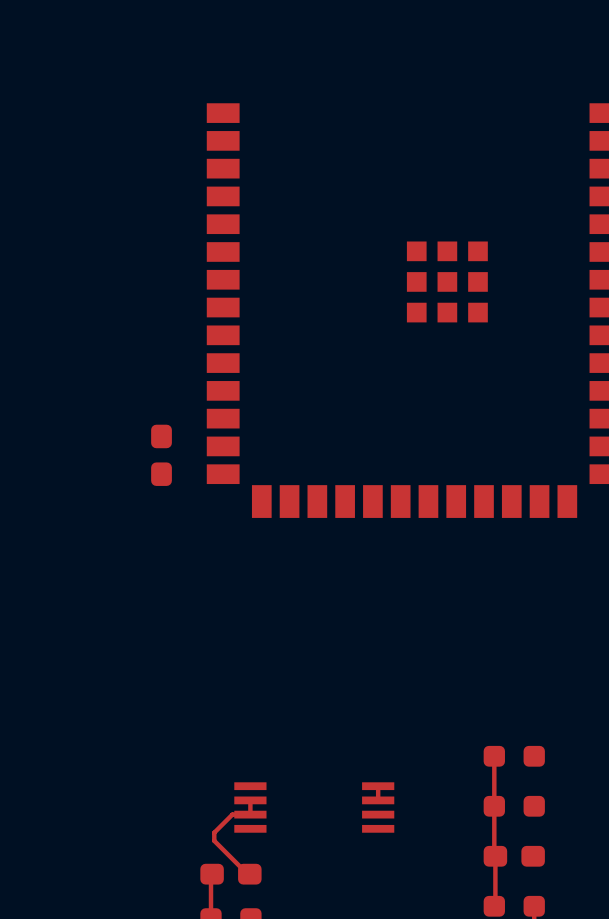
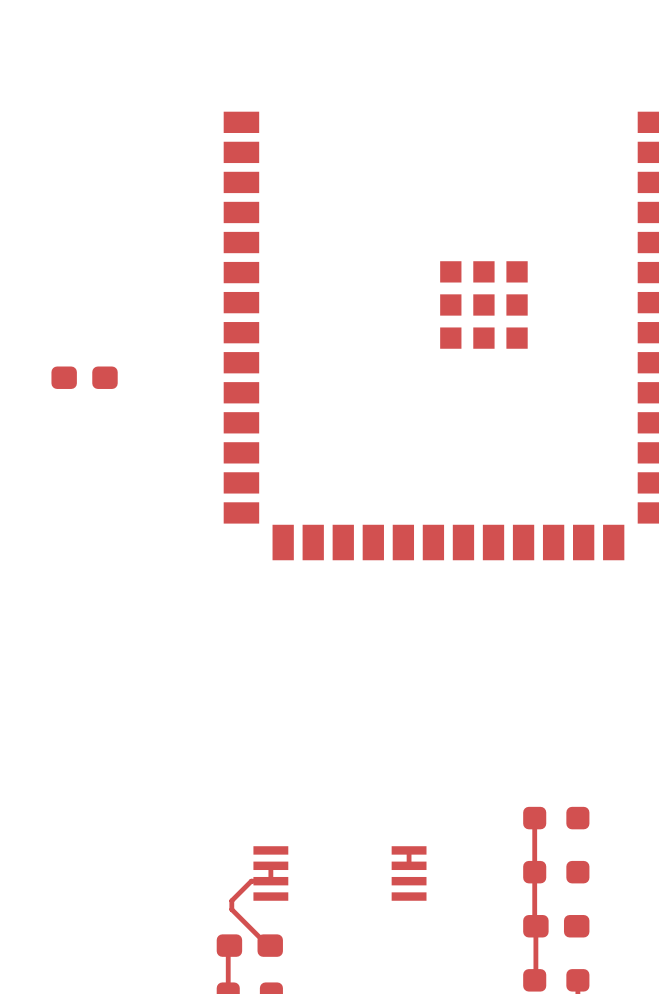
part rotation: 0° (161, 455) -> 90° clockwise (84, 377)
part position: (161, 455) -> (84, 377)

